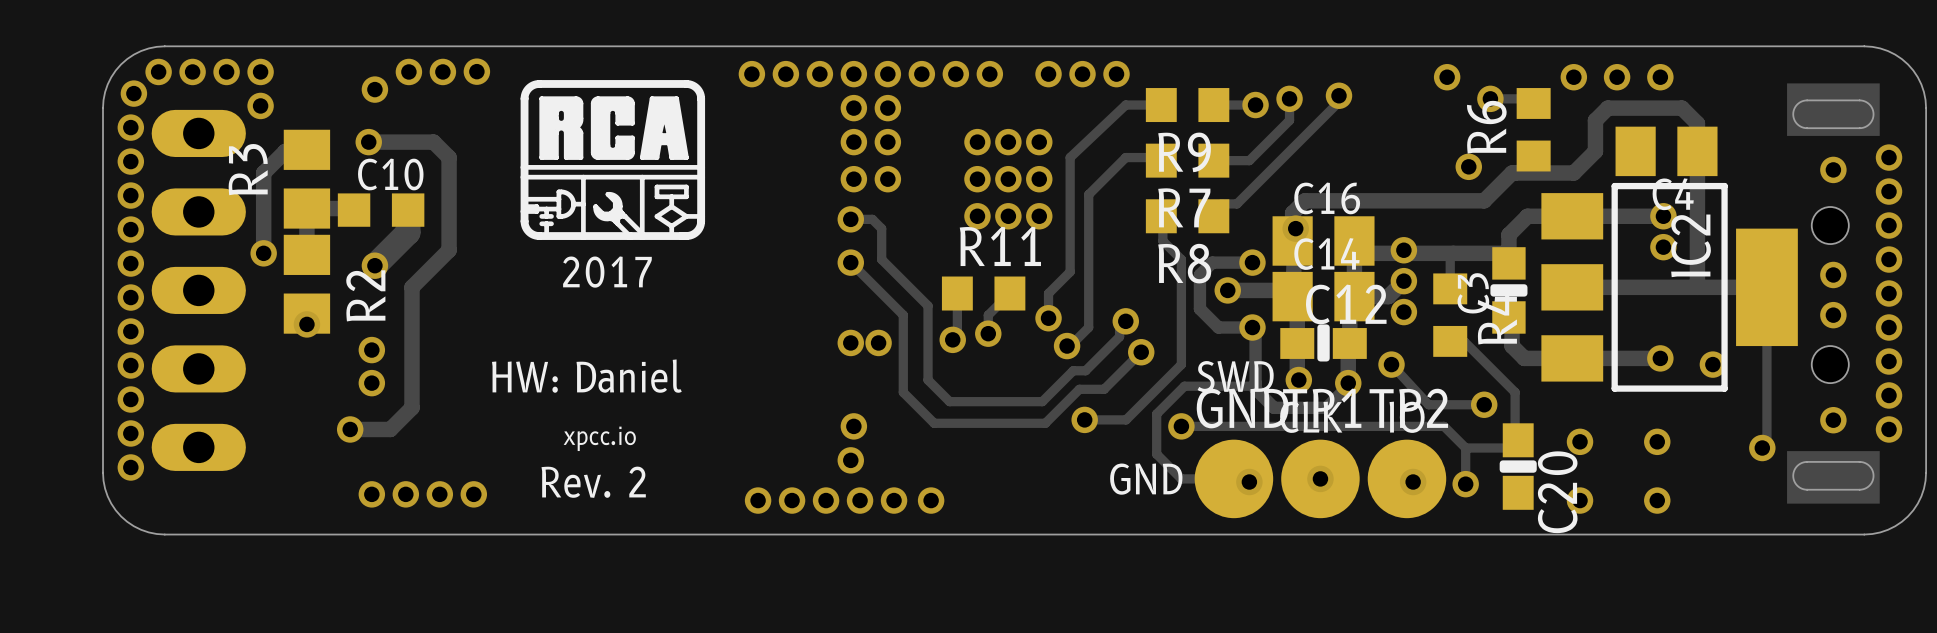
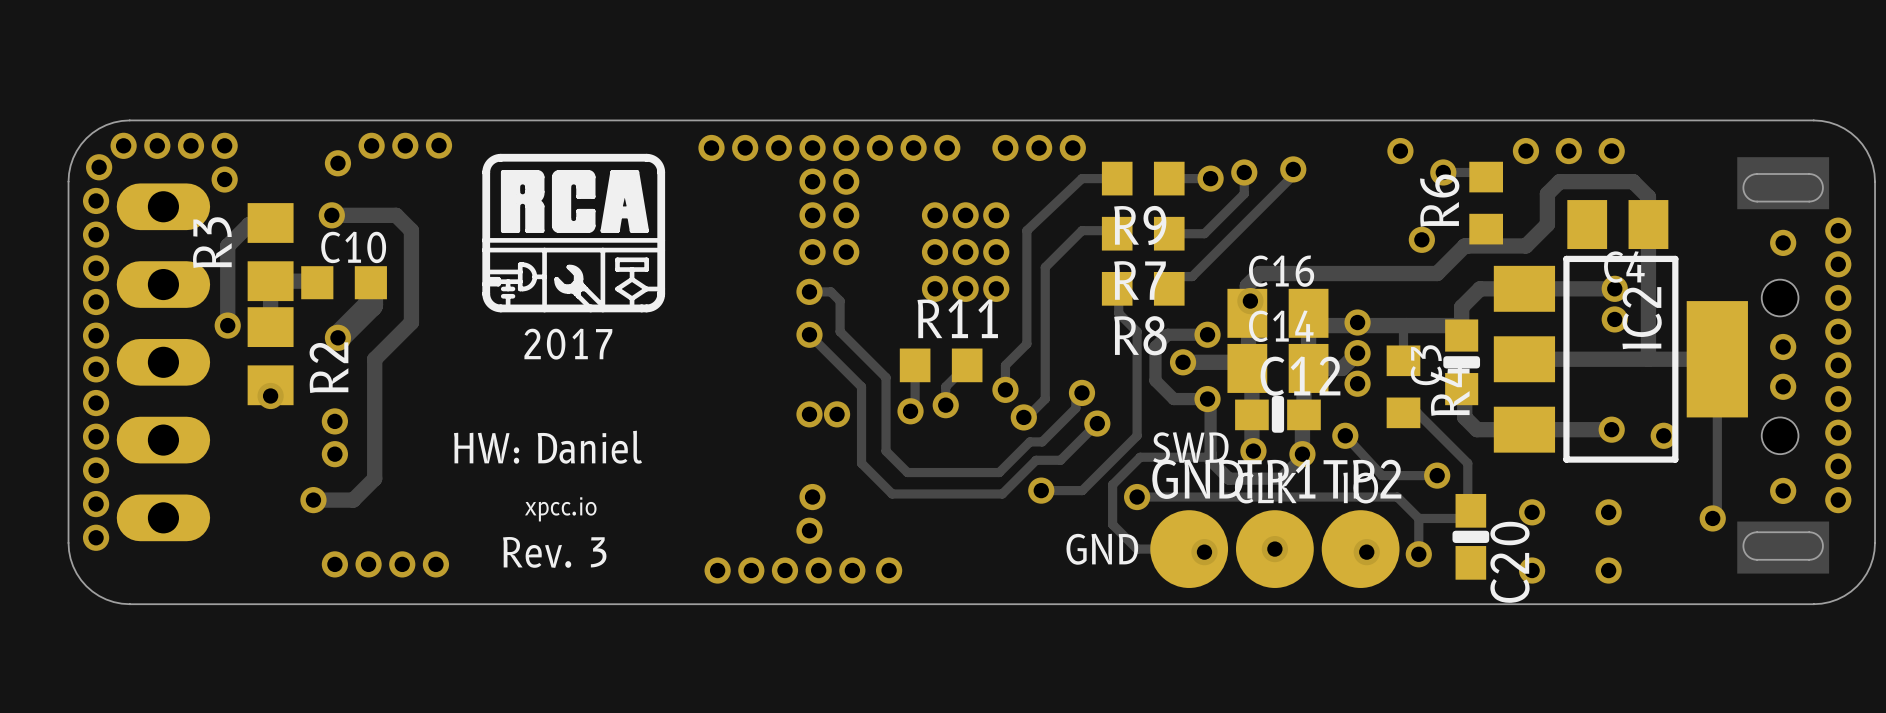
text: Rev. 2 (593, 482) -> Rev. 3 (554, 552)

